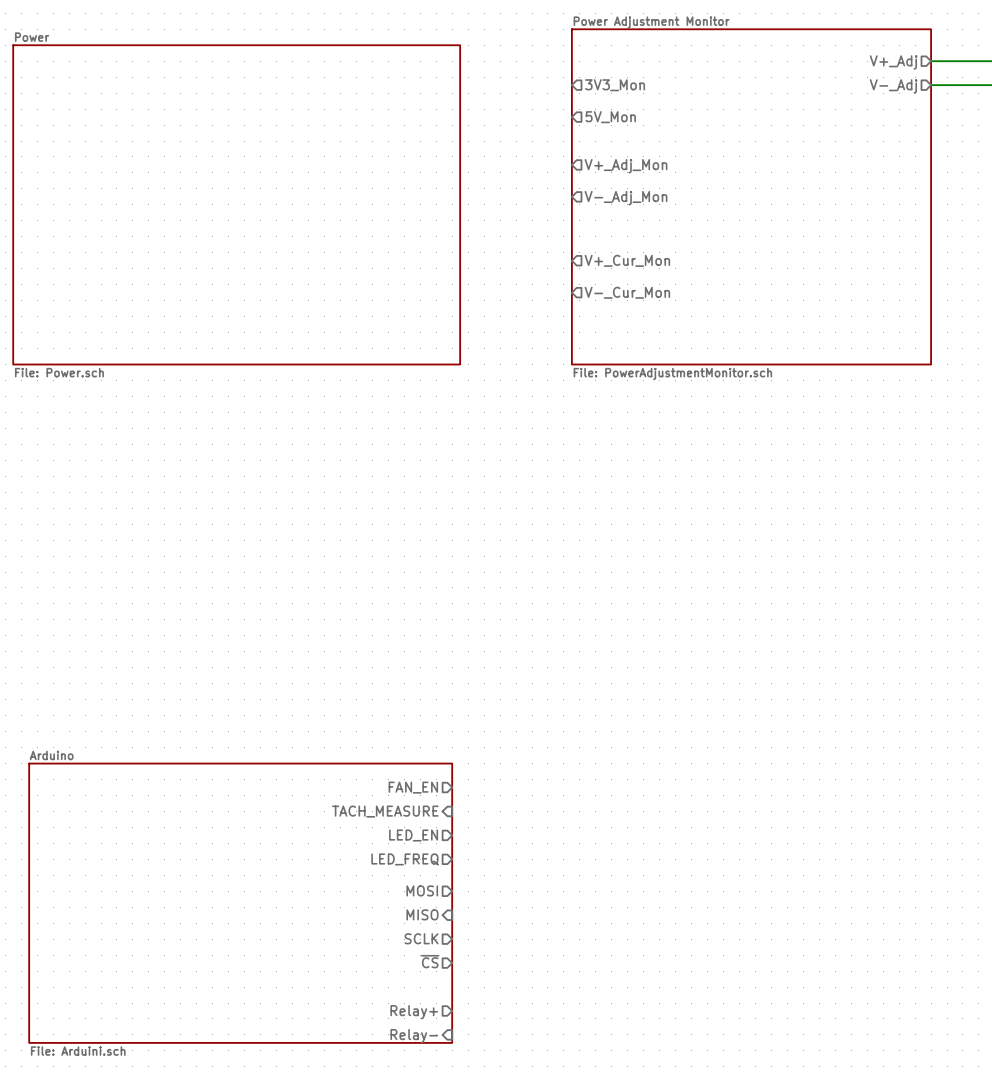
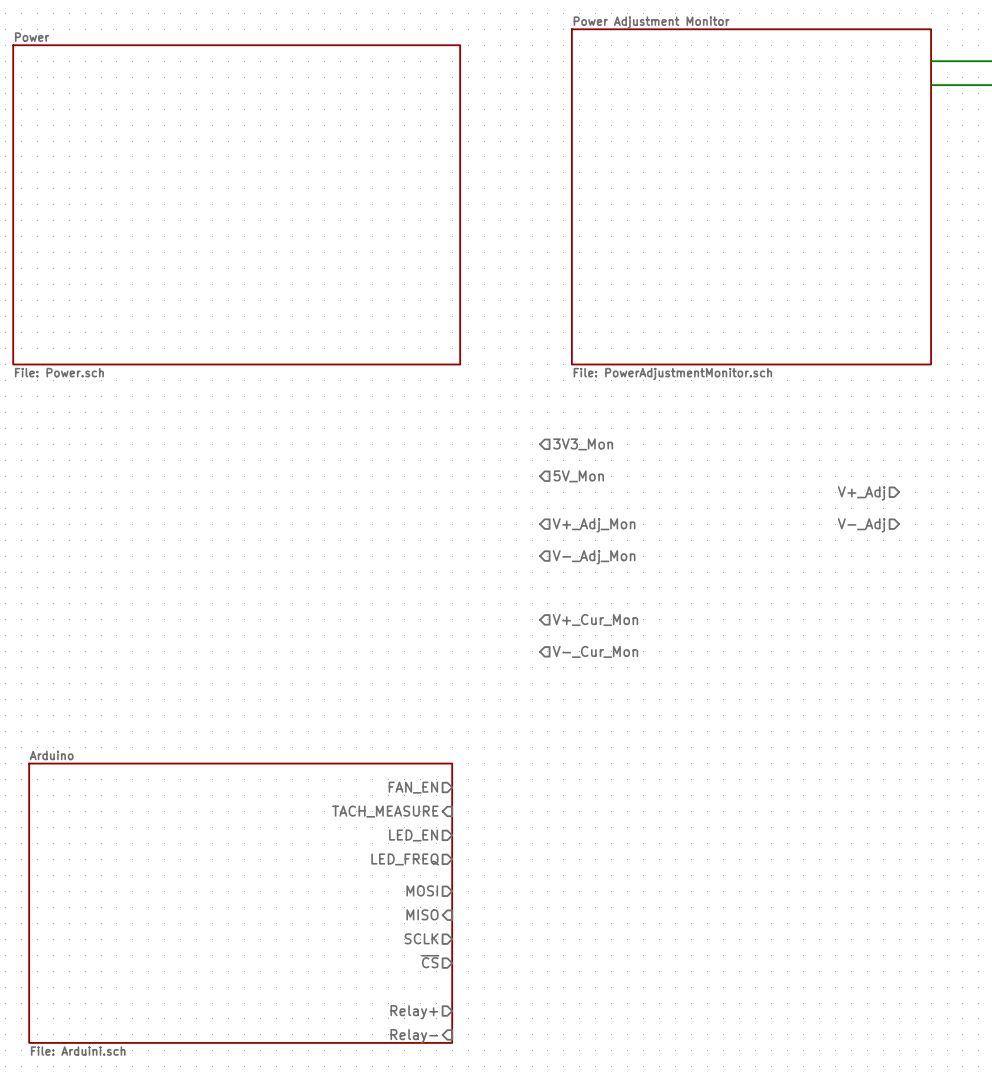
sheet pin: V+_Adj (893, 62) -> none
sheet pin: 3V3_Mon (615, 85) -> none
sheet pin: V-_Adj (893, 86) -> none
sheet pin: 5V_Mon (610, 117) -> none
sheet pin: V+_Adj_Mon (626, 166) -> none
sheet pin: V-_Adj_Mon (626, 198) -> none
sheet pin: V+_Cur_Mon (627, 260) -> none
sheet pin: V-_Cur_Mon (627, 292) -> none
sheet pin: none -> 3V3_Mon (583, 444)
sheet pin: none -> 5V_Mon (578, 476)
sheet pin: none -> V+_Adj (861, 493)
sheet pin: none -> V+_Adj_Mon (594, 525)
sheet pin: none -> V-_Adj (861, 525)
sheet pin: none -> V-_Adj_Mon (594, 557)
sheet pin: none -> V+_Cur_Mon (595, 620)
sheet pin: none -> V-_Cur_Mon (595, 651)

